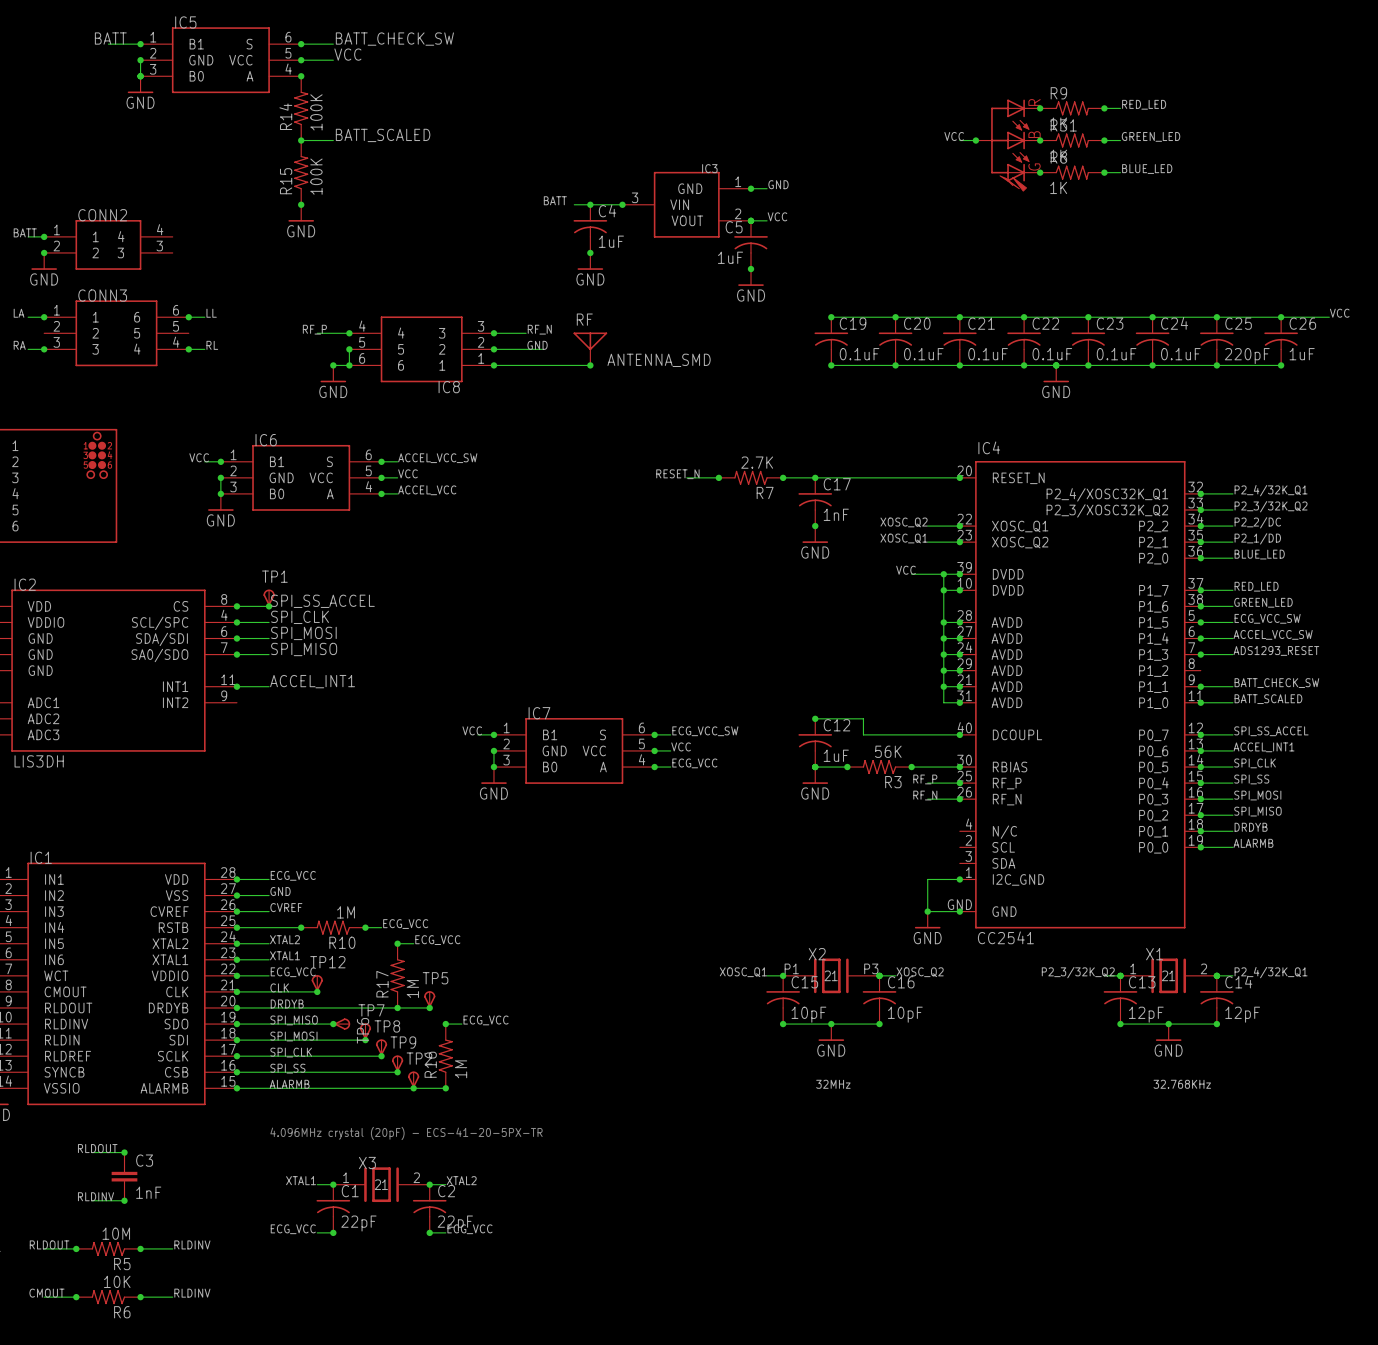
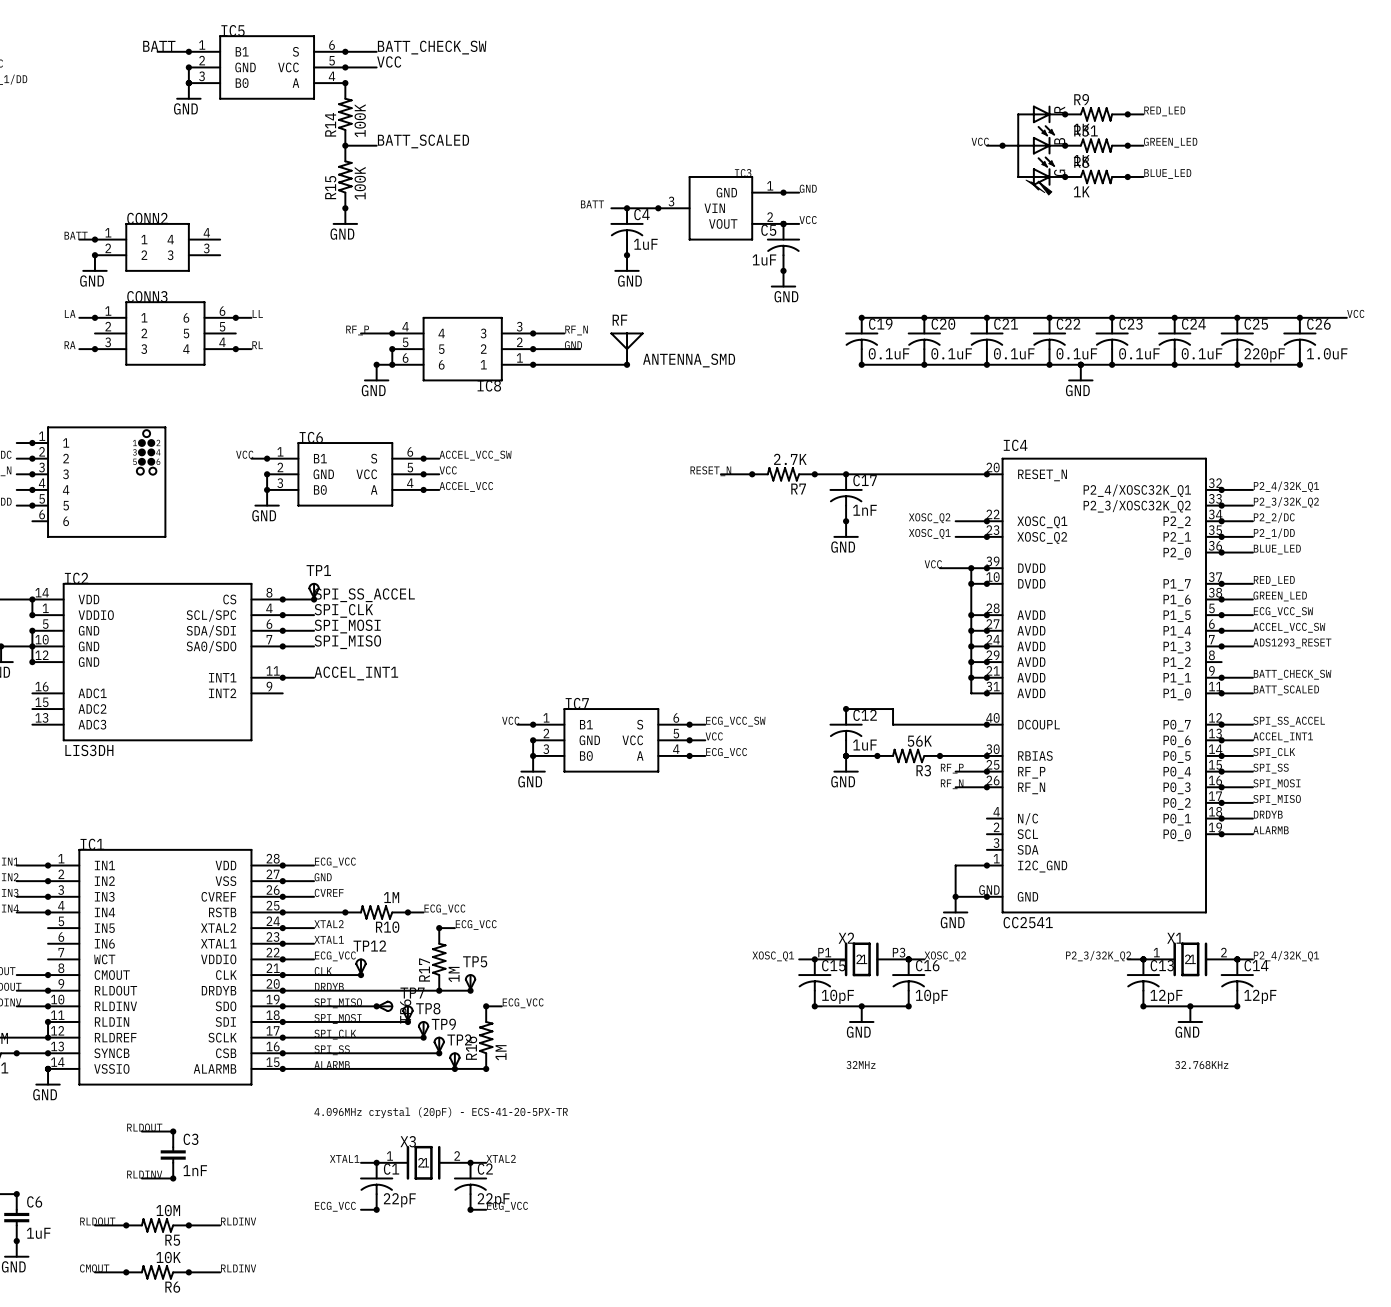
C26 value: 1uF (1302, 354) -> 1.0uF (1327, 353)

